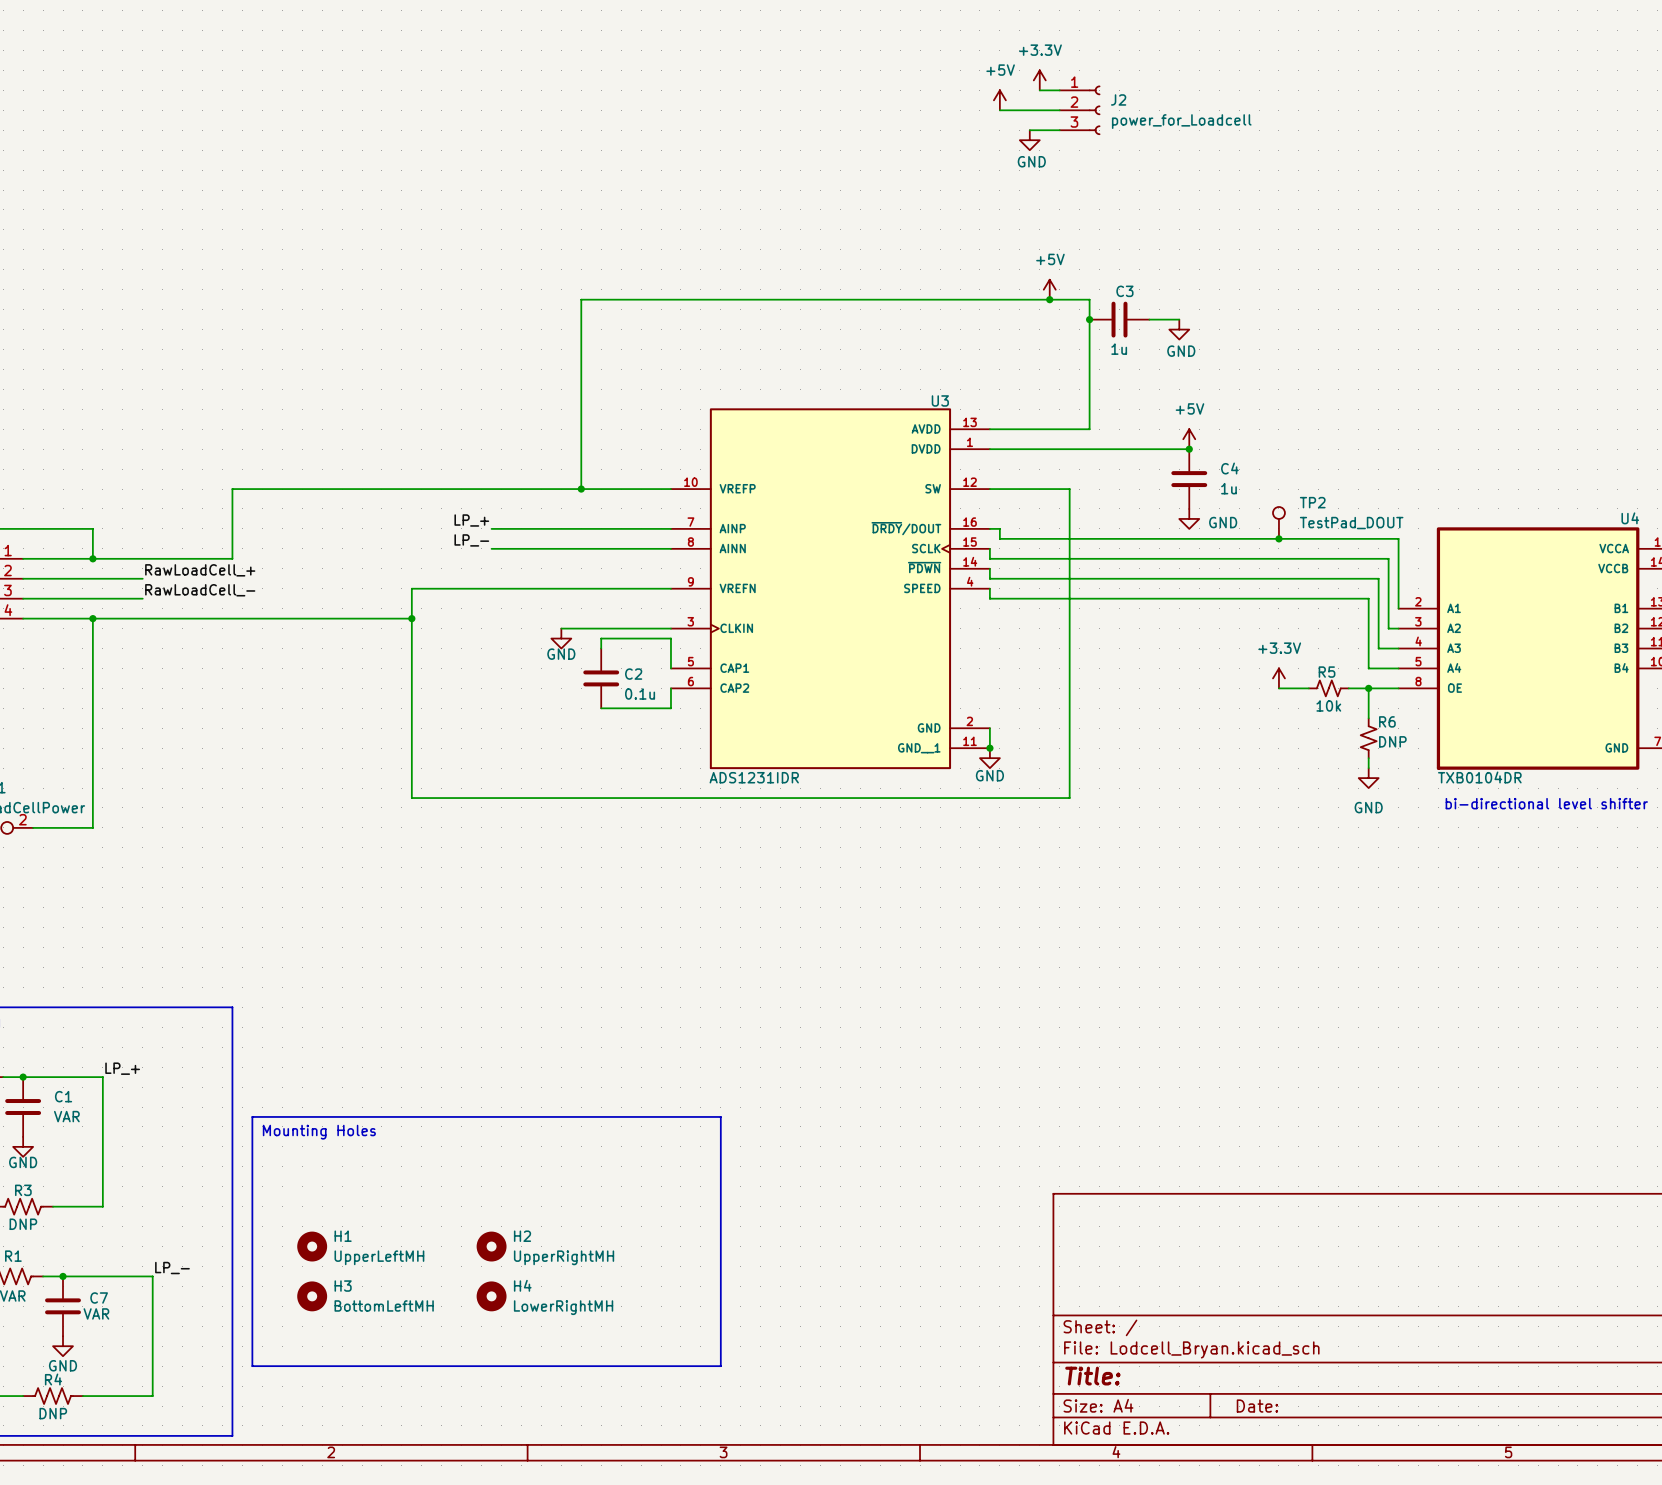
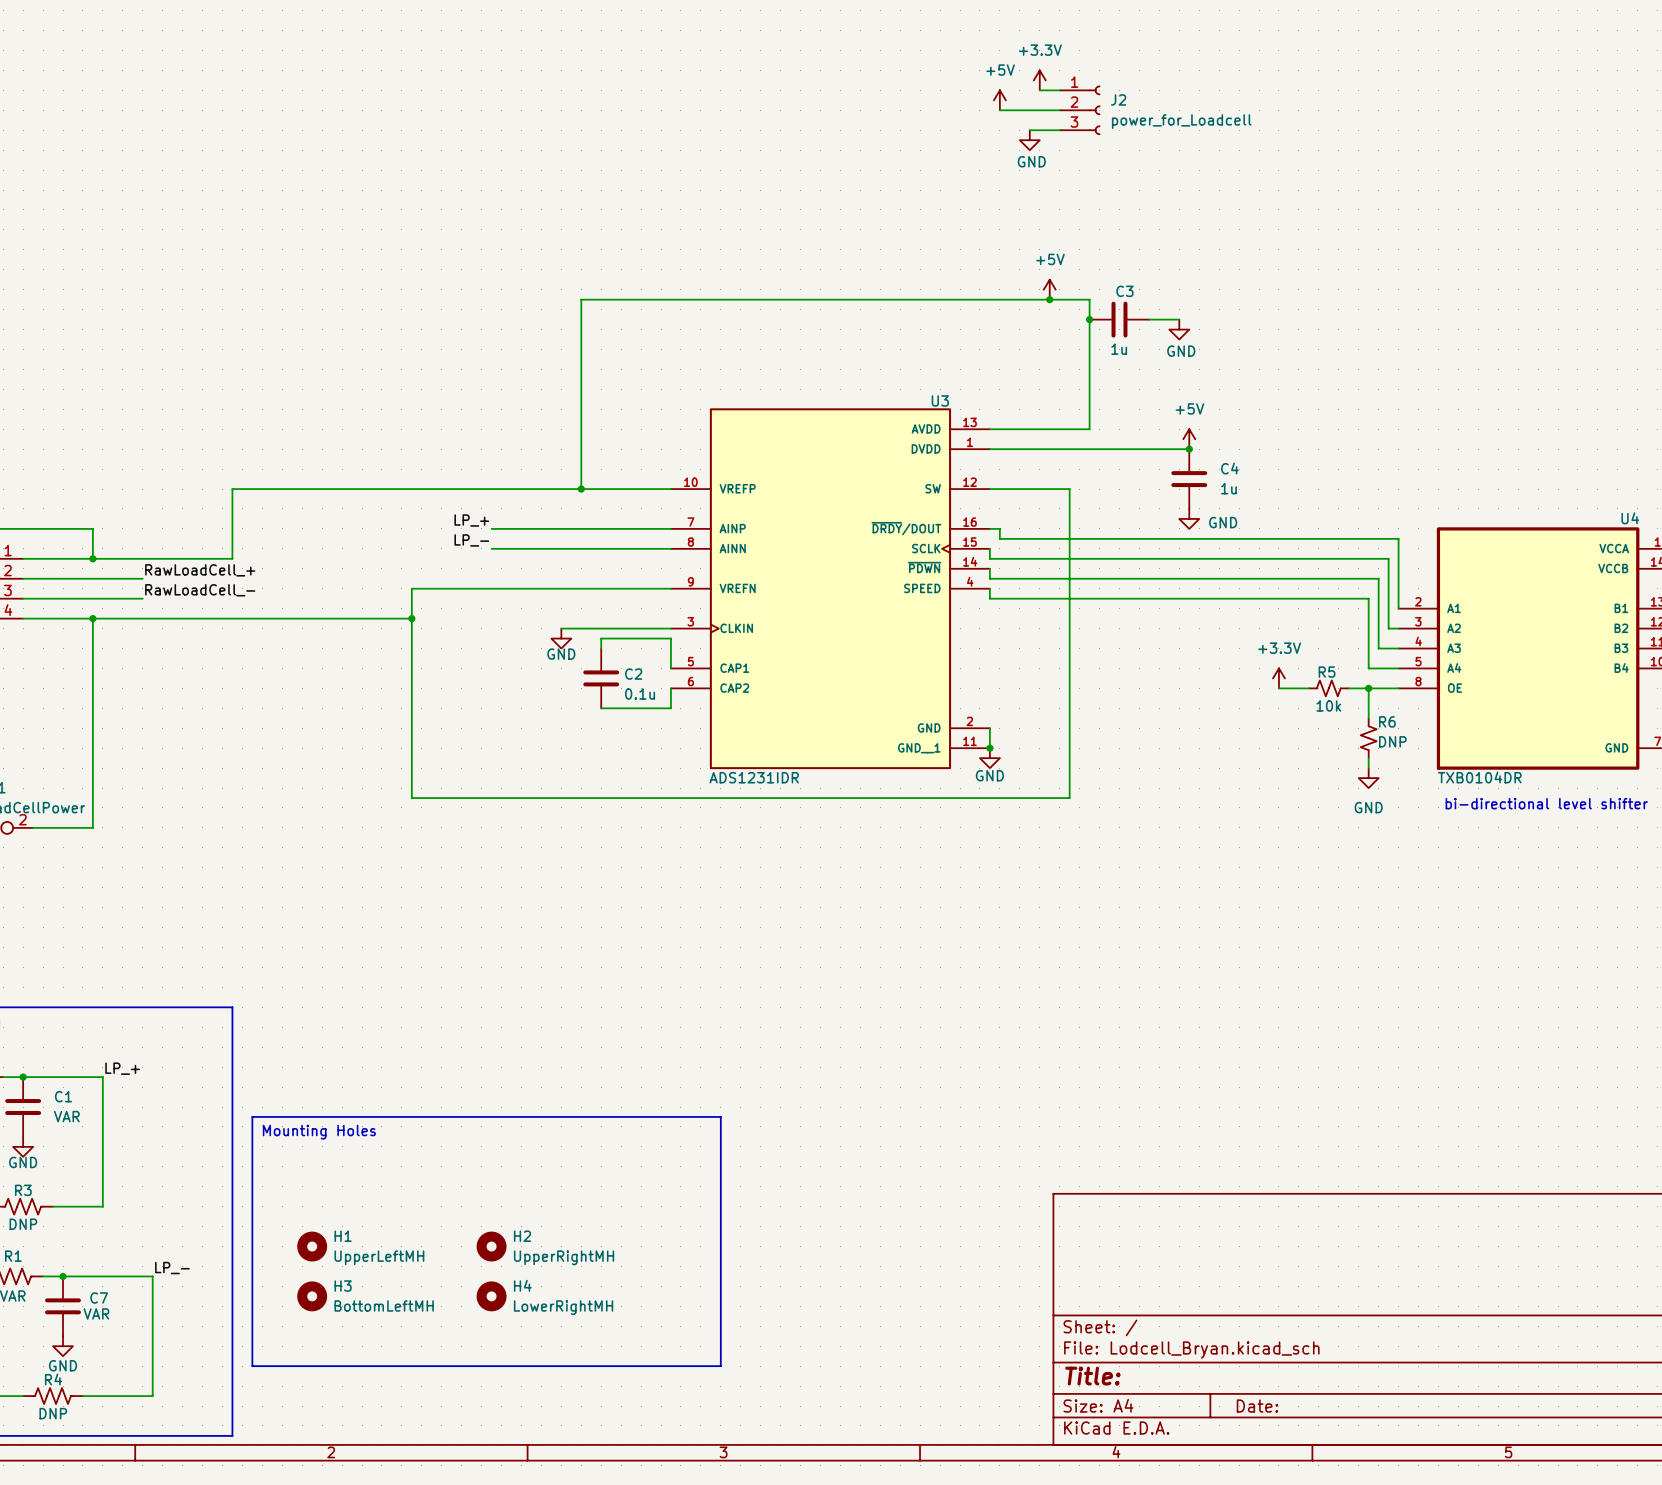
TP2: TestPad_DOUT (1278, 522) -> none
junction: (1278, 538) -> none

